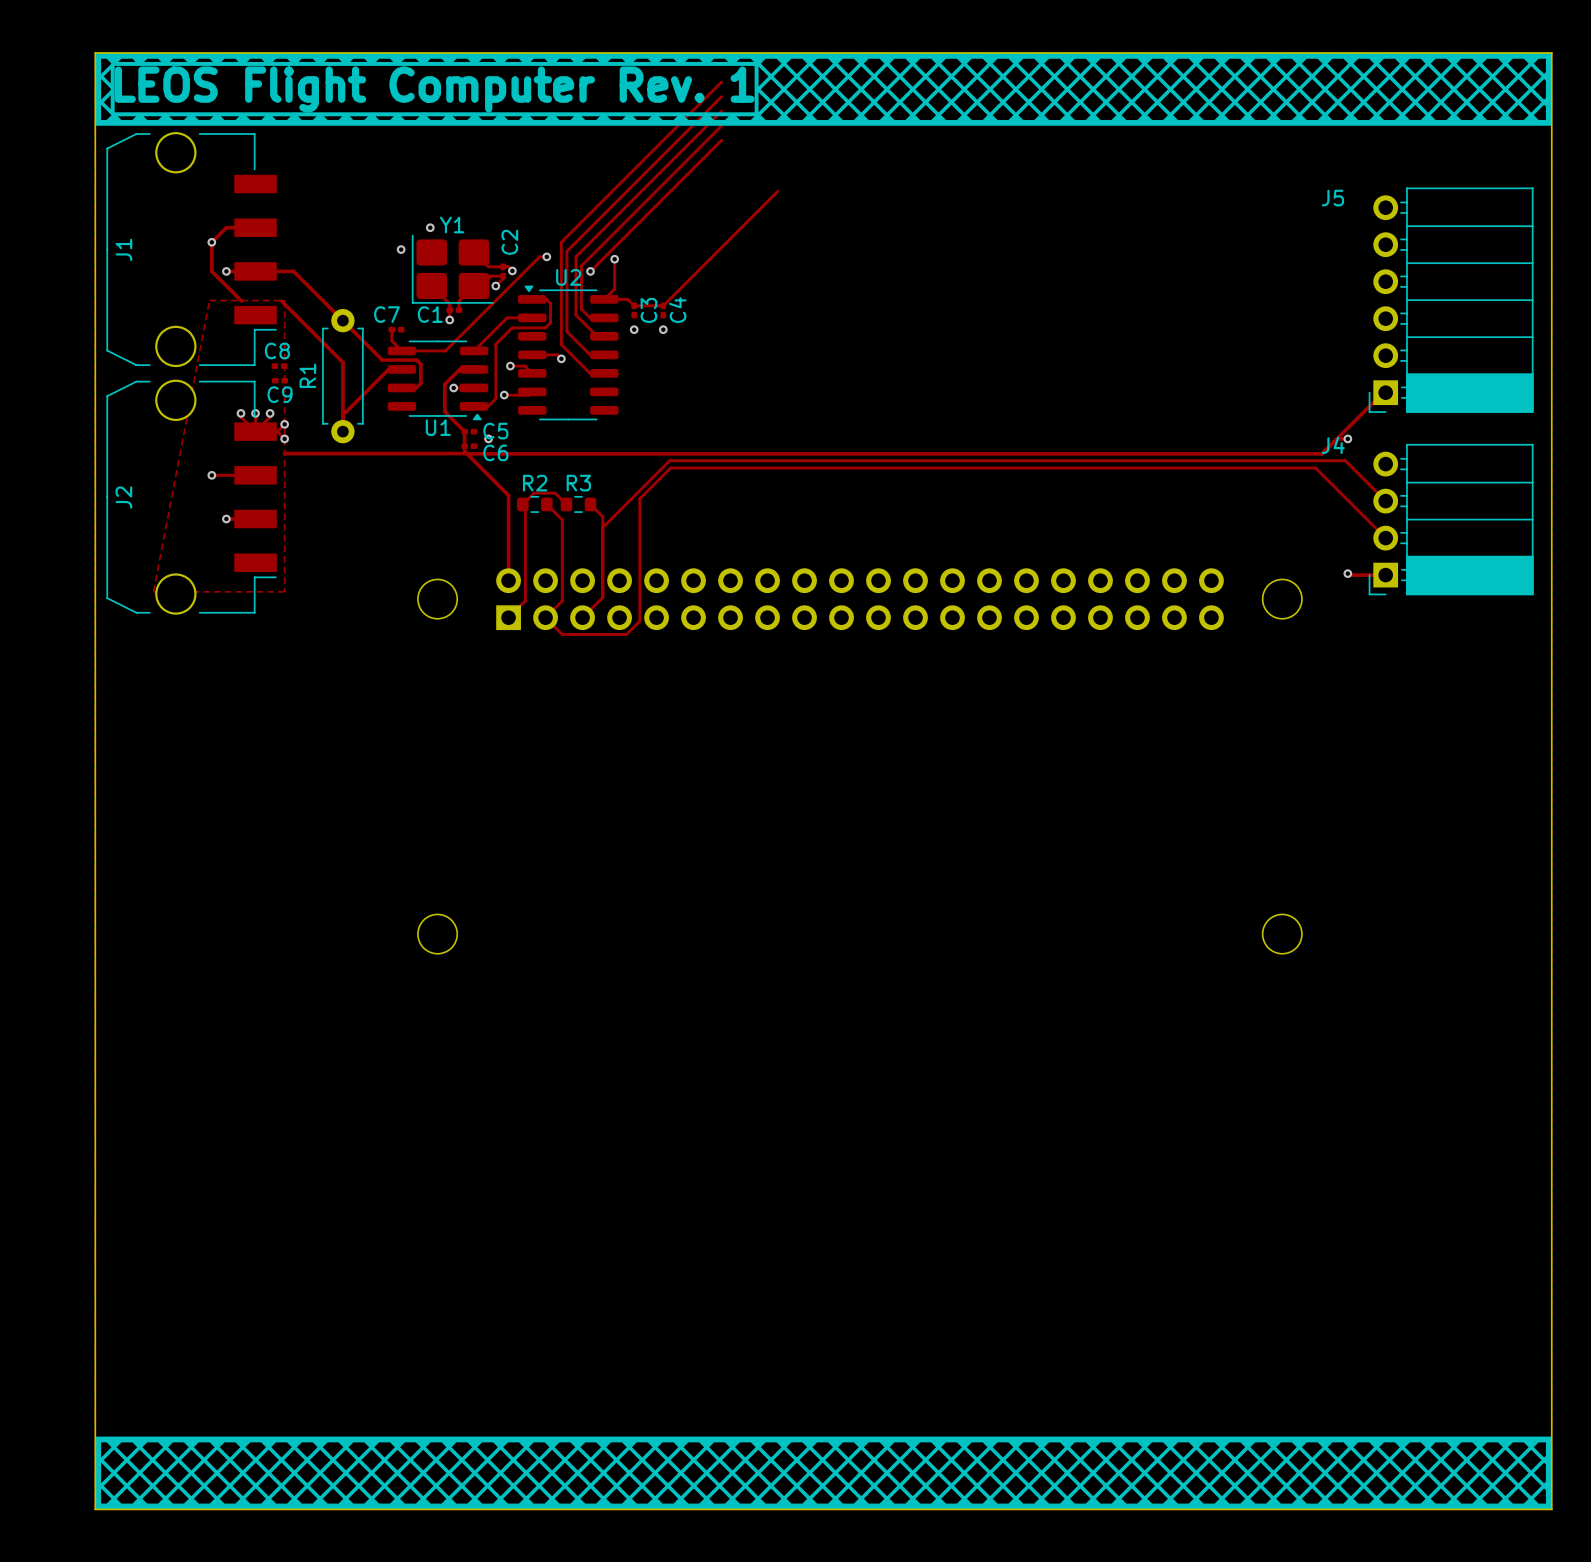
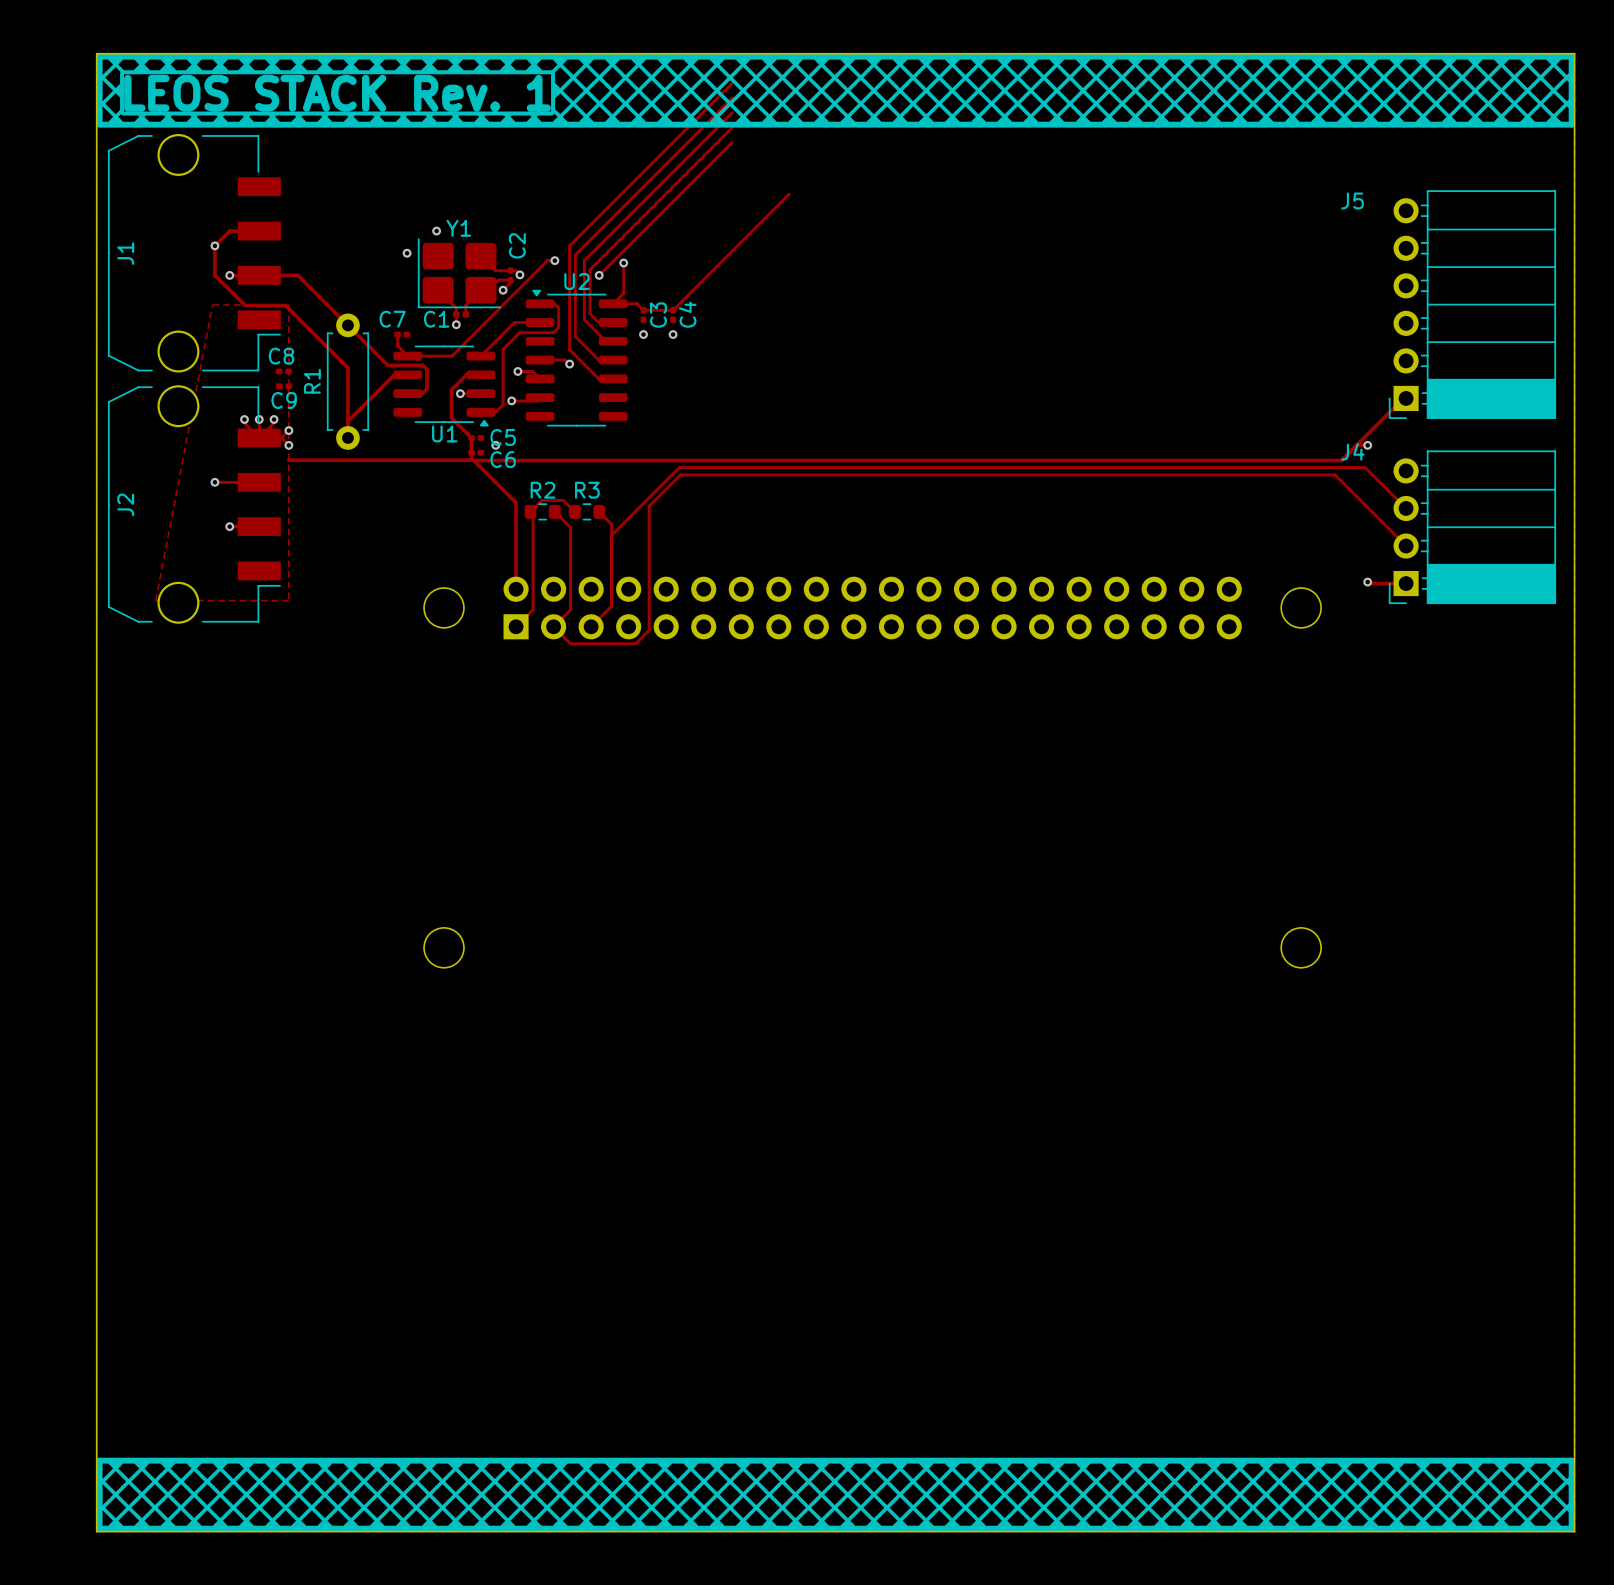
drawing shape: [95, 52, 1552, 126] -> [96, 53, 1575, 128]
text: LEOS Flight Computer Rev. 1 (434, 89) -> none
text: none -> LEOS STACK Rev. 1 (337, 93)
track: none -> (245, 305) (285, 305)

